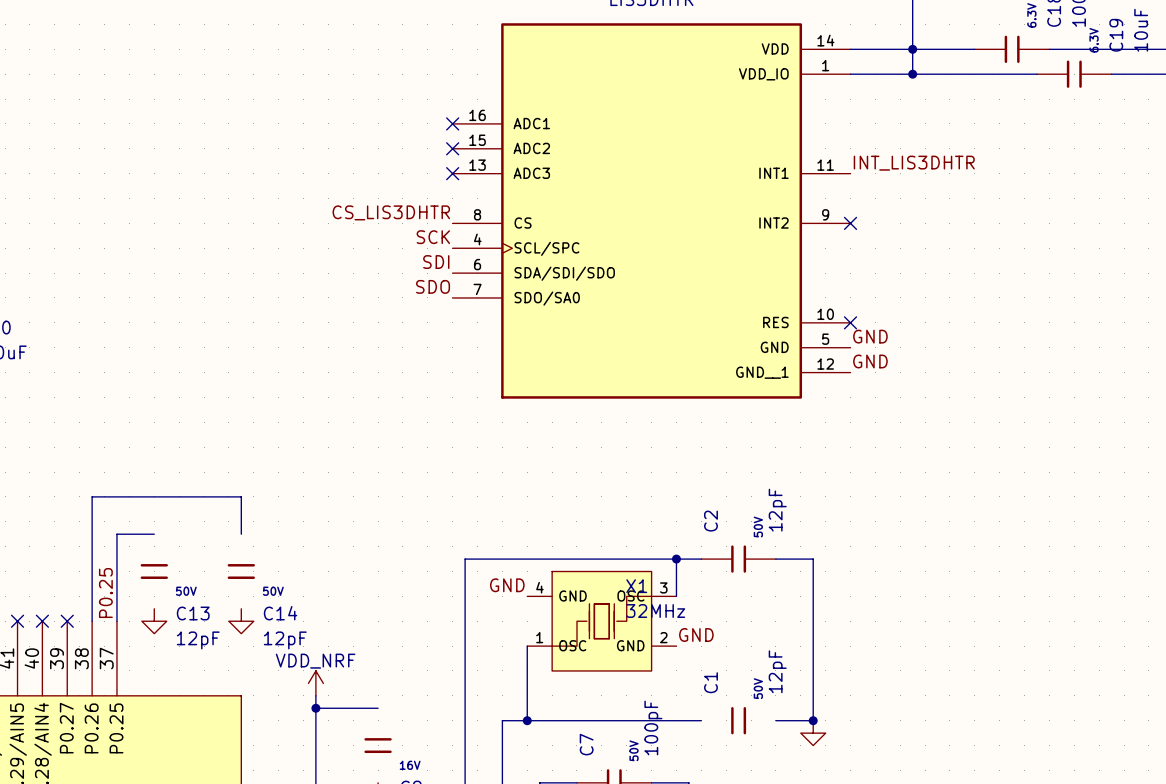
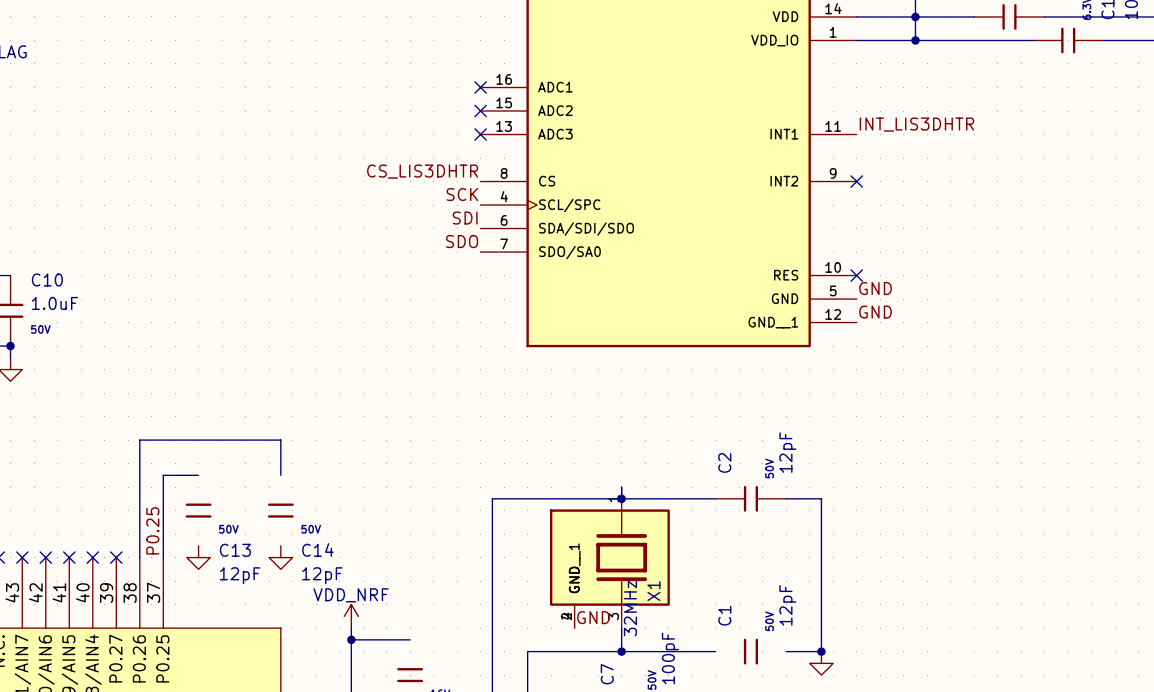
wire: none -> (621, 487) (621, 498)
junction: none -> (621, 498)
wire: (676, 559) (676, 596) -> none
junction: (676, 559) -> none
X1 symbol: [527, 571, 677, 671] -> [549, 487, 670, 629]
label: GND (507, 585) -> none
X1 name position: X1 (636, 586) -> X1 (653, 591)
X1 value position: 32MHz (655, 611) -> 32MHz (630, 608)
label: GND (696, 635) -> none
wire: (527, 646) (527, 720) -> none
label: none -> GND (593, 617)
wire: none -> (621, 628) (621, 651)
junction: (527, 720) -> none
junction: none -> (621, 651)

